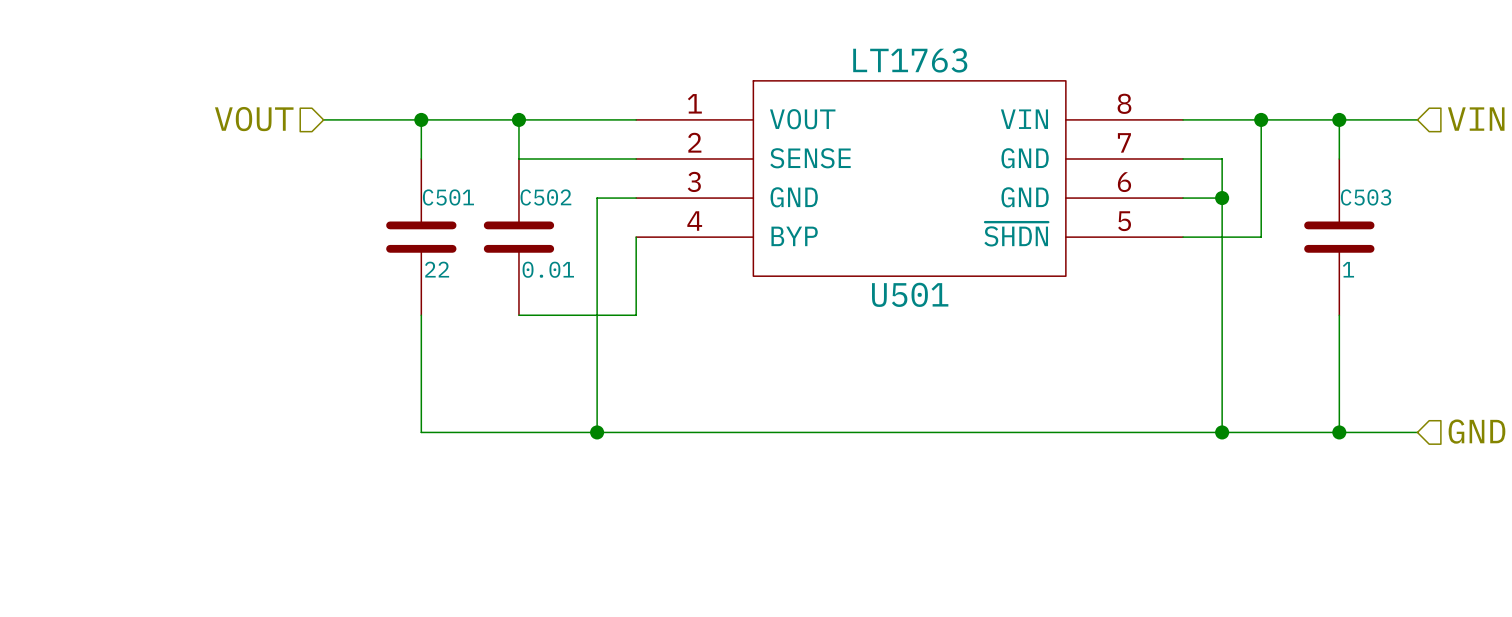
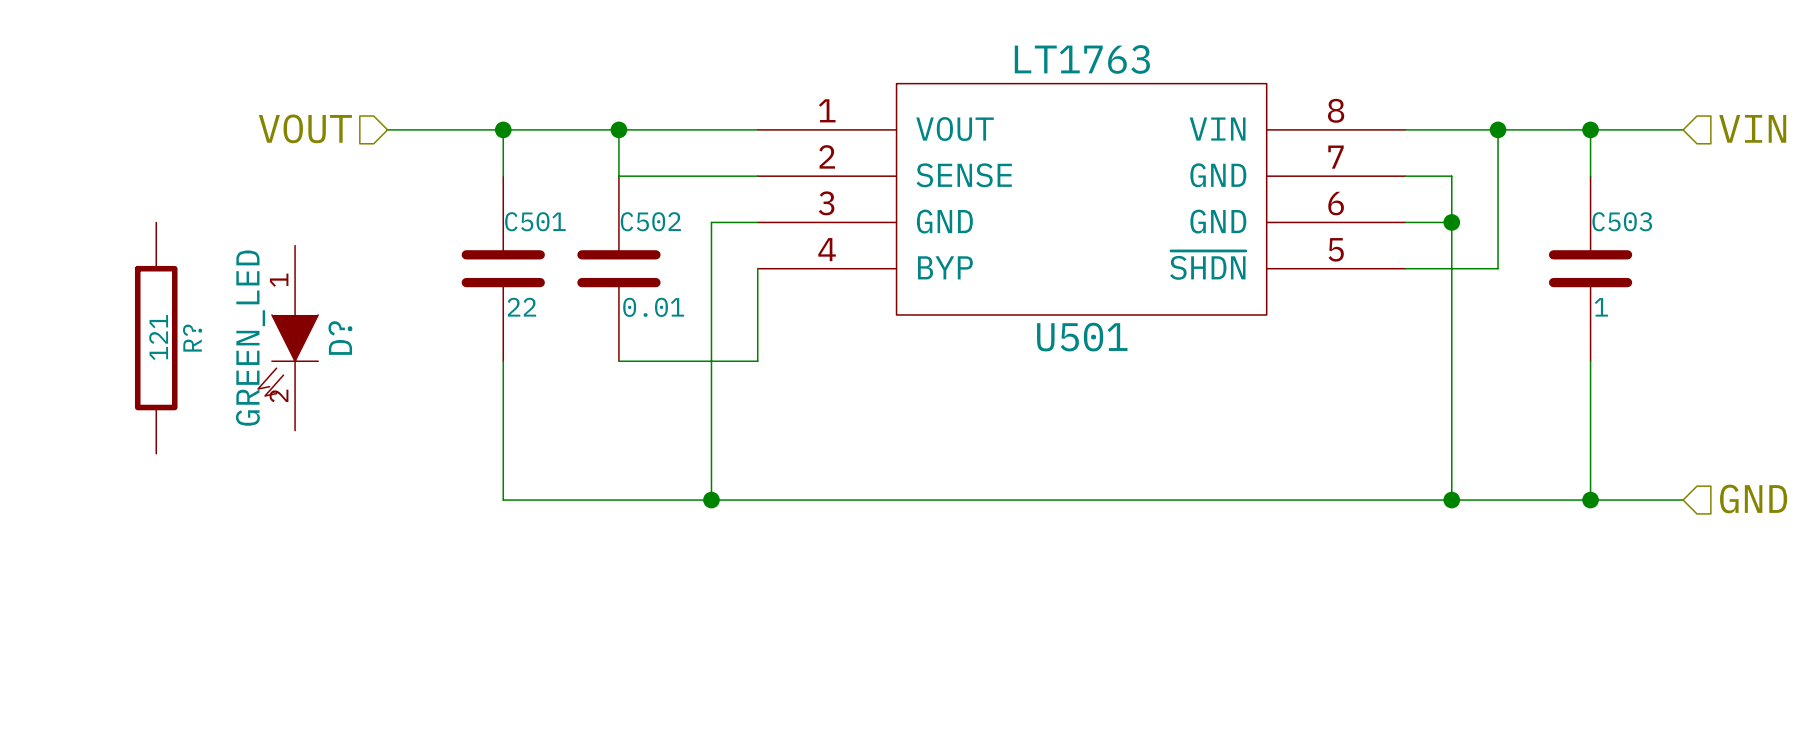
R?: none -> 121 (156, 338)
D?: none -> GREEN_LED (288, 338)

